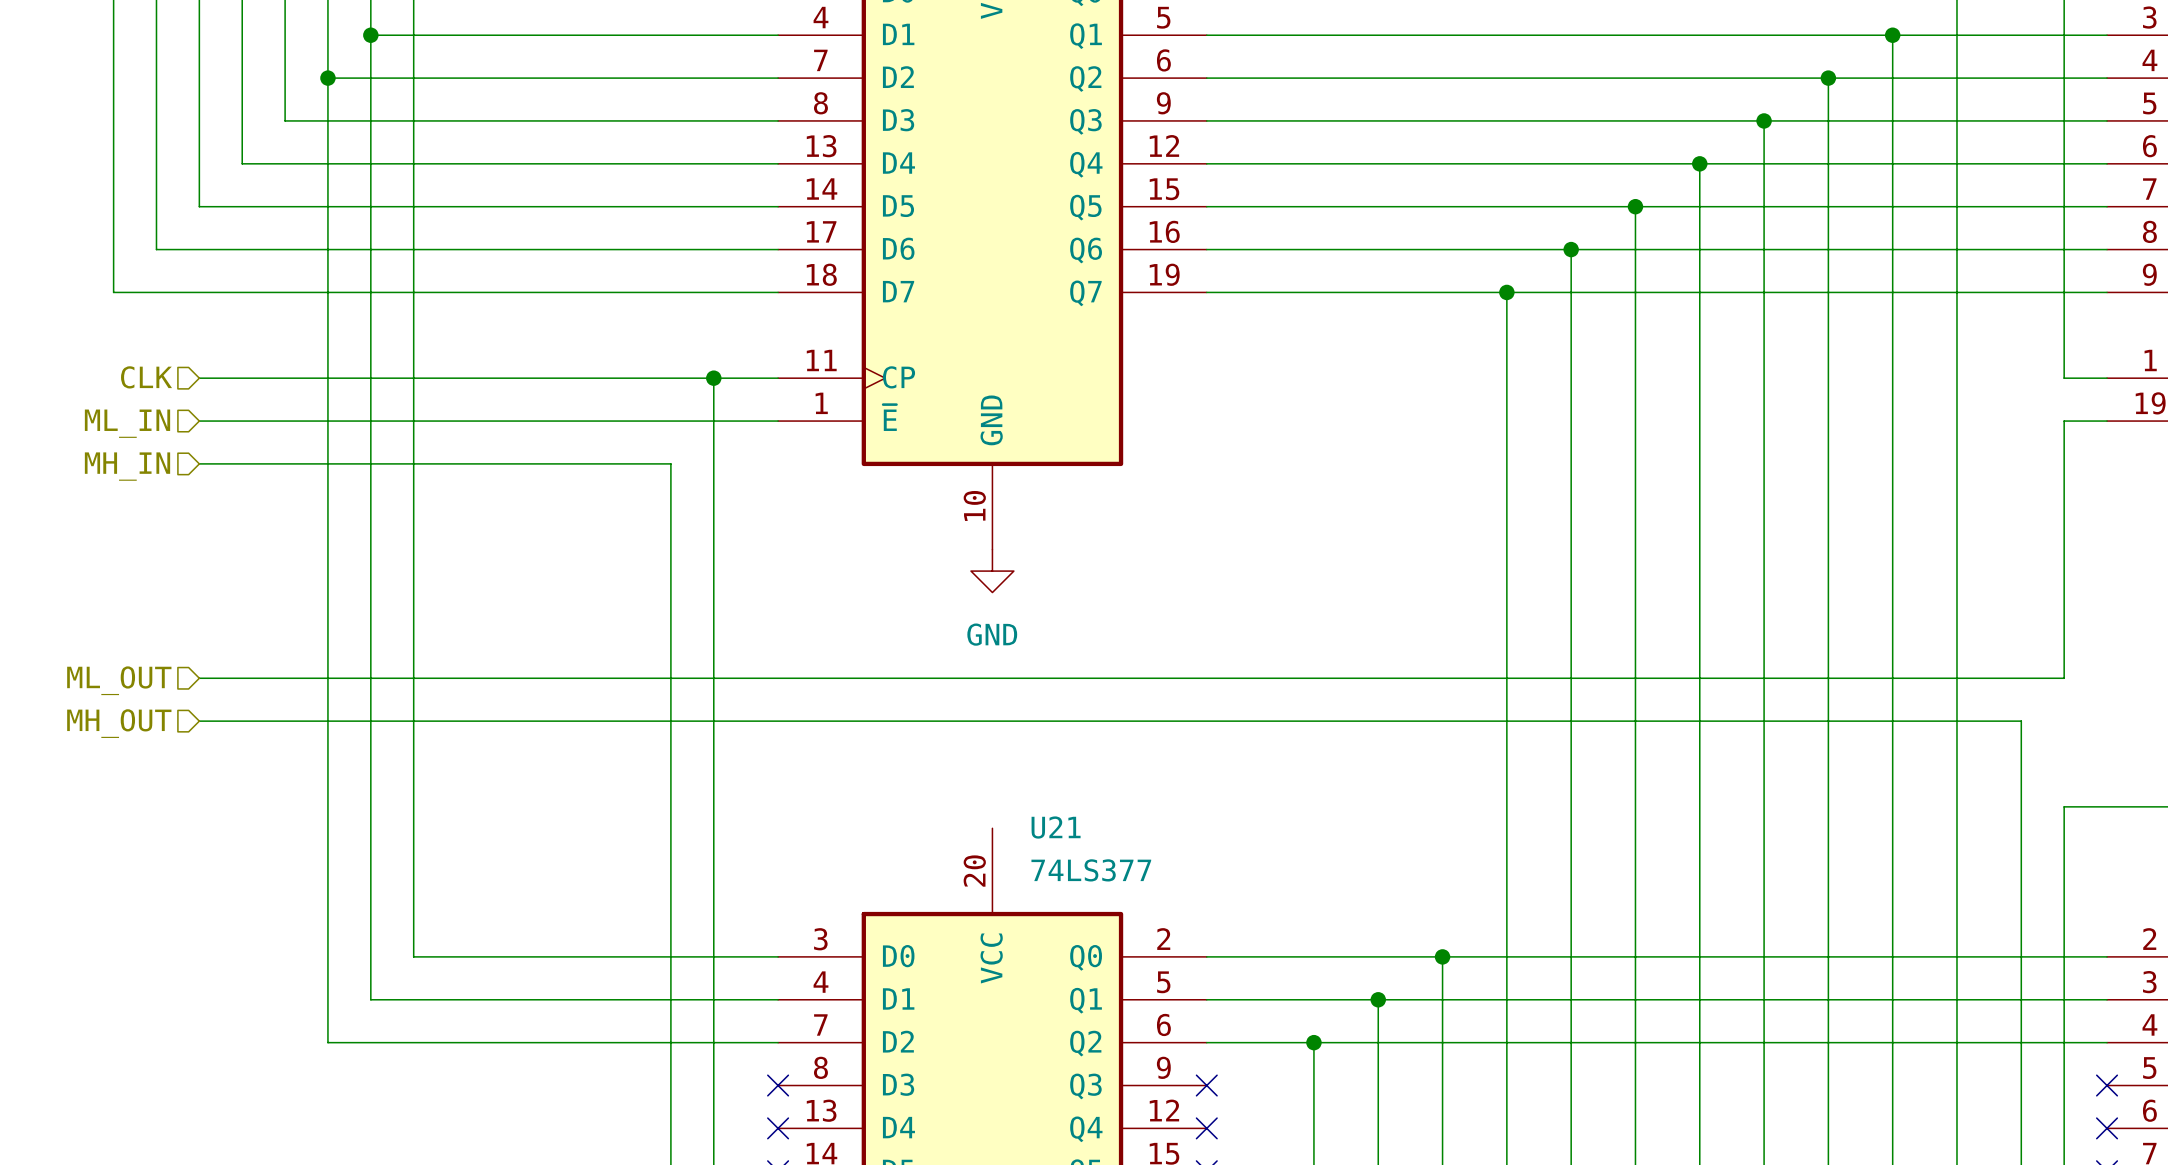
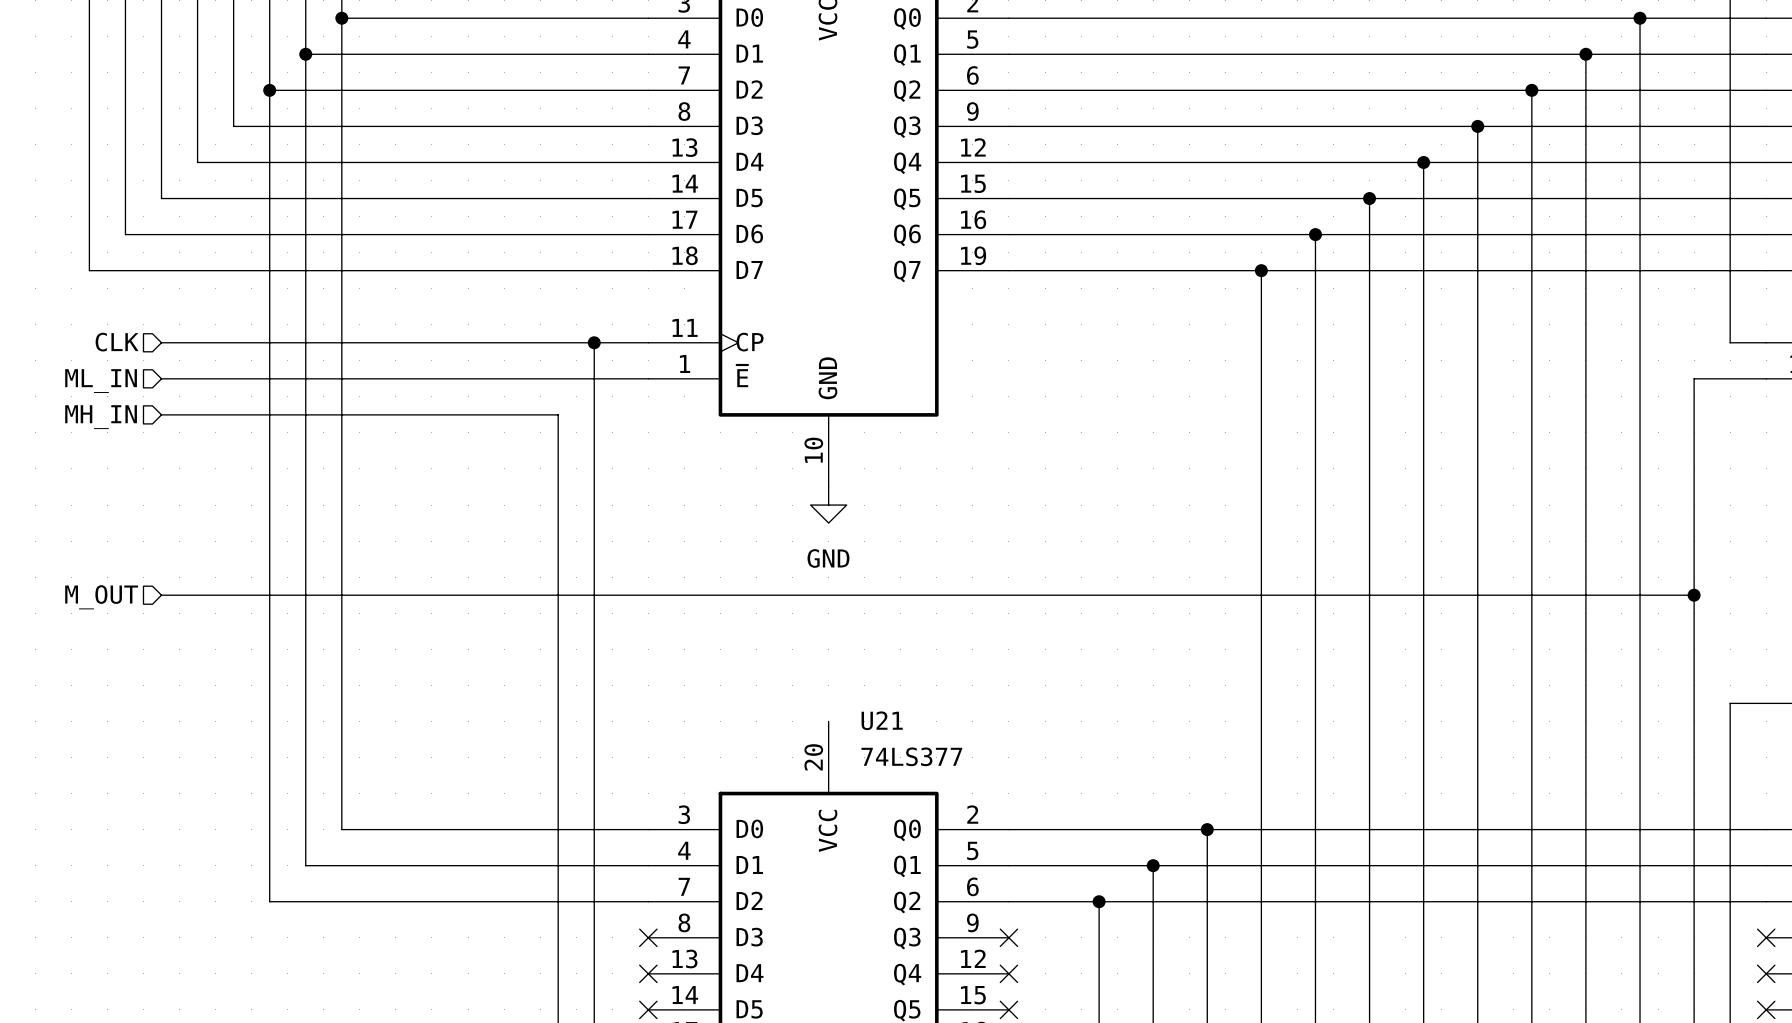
wire: (2064, 421) (2064, 678) (2021, 678) -> (1730, 378) (1694, 378) (1694, 631)
junction: none -> (1694, 595)
hierarchical label: ML_OUT (119, 680) -> M_OUT (101, 597)
wire: (199, 721) (2021, 721) -> none
hierarchical label: MH_OUT (119, 723) -> none

